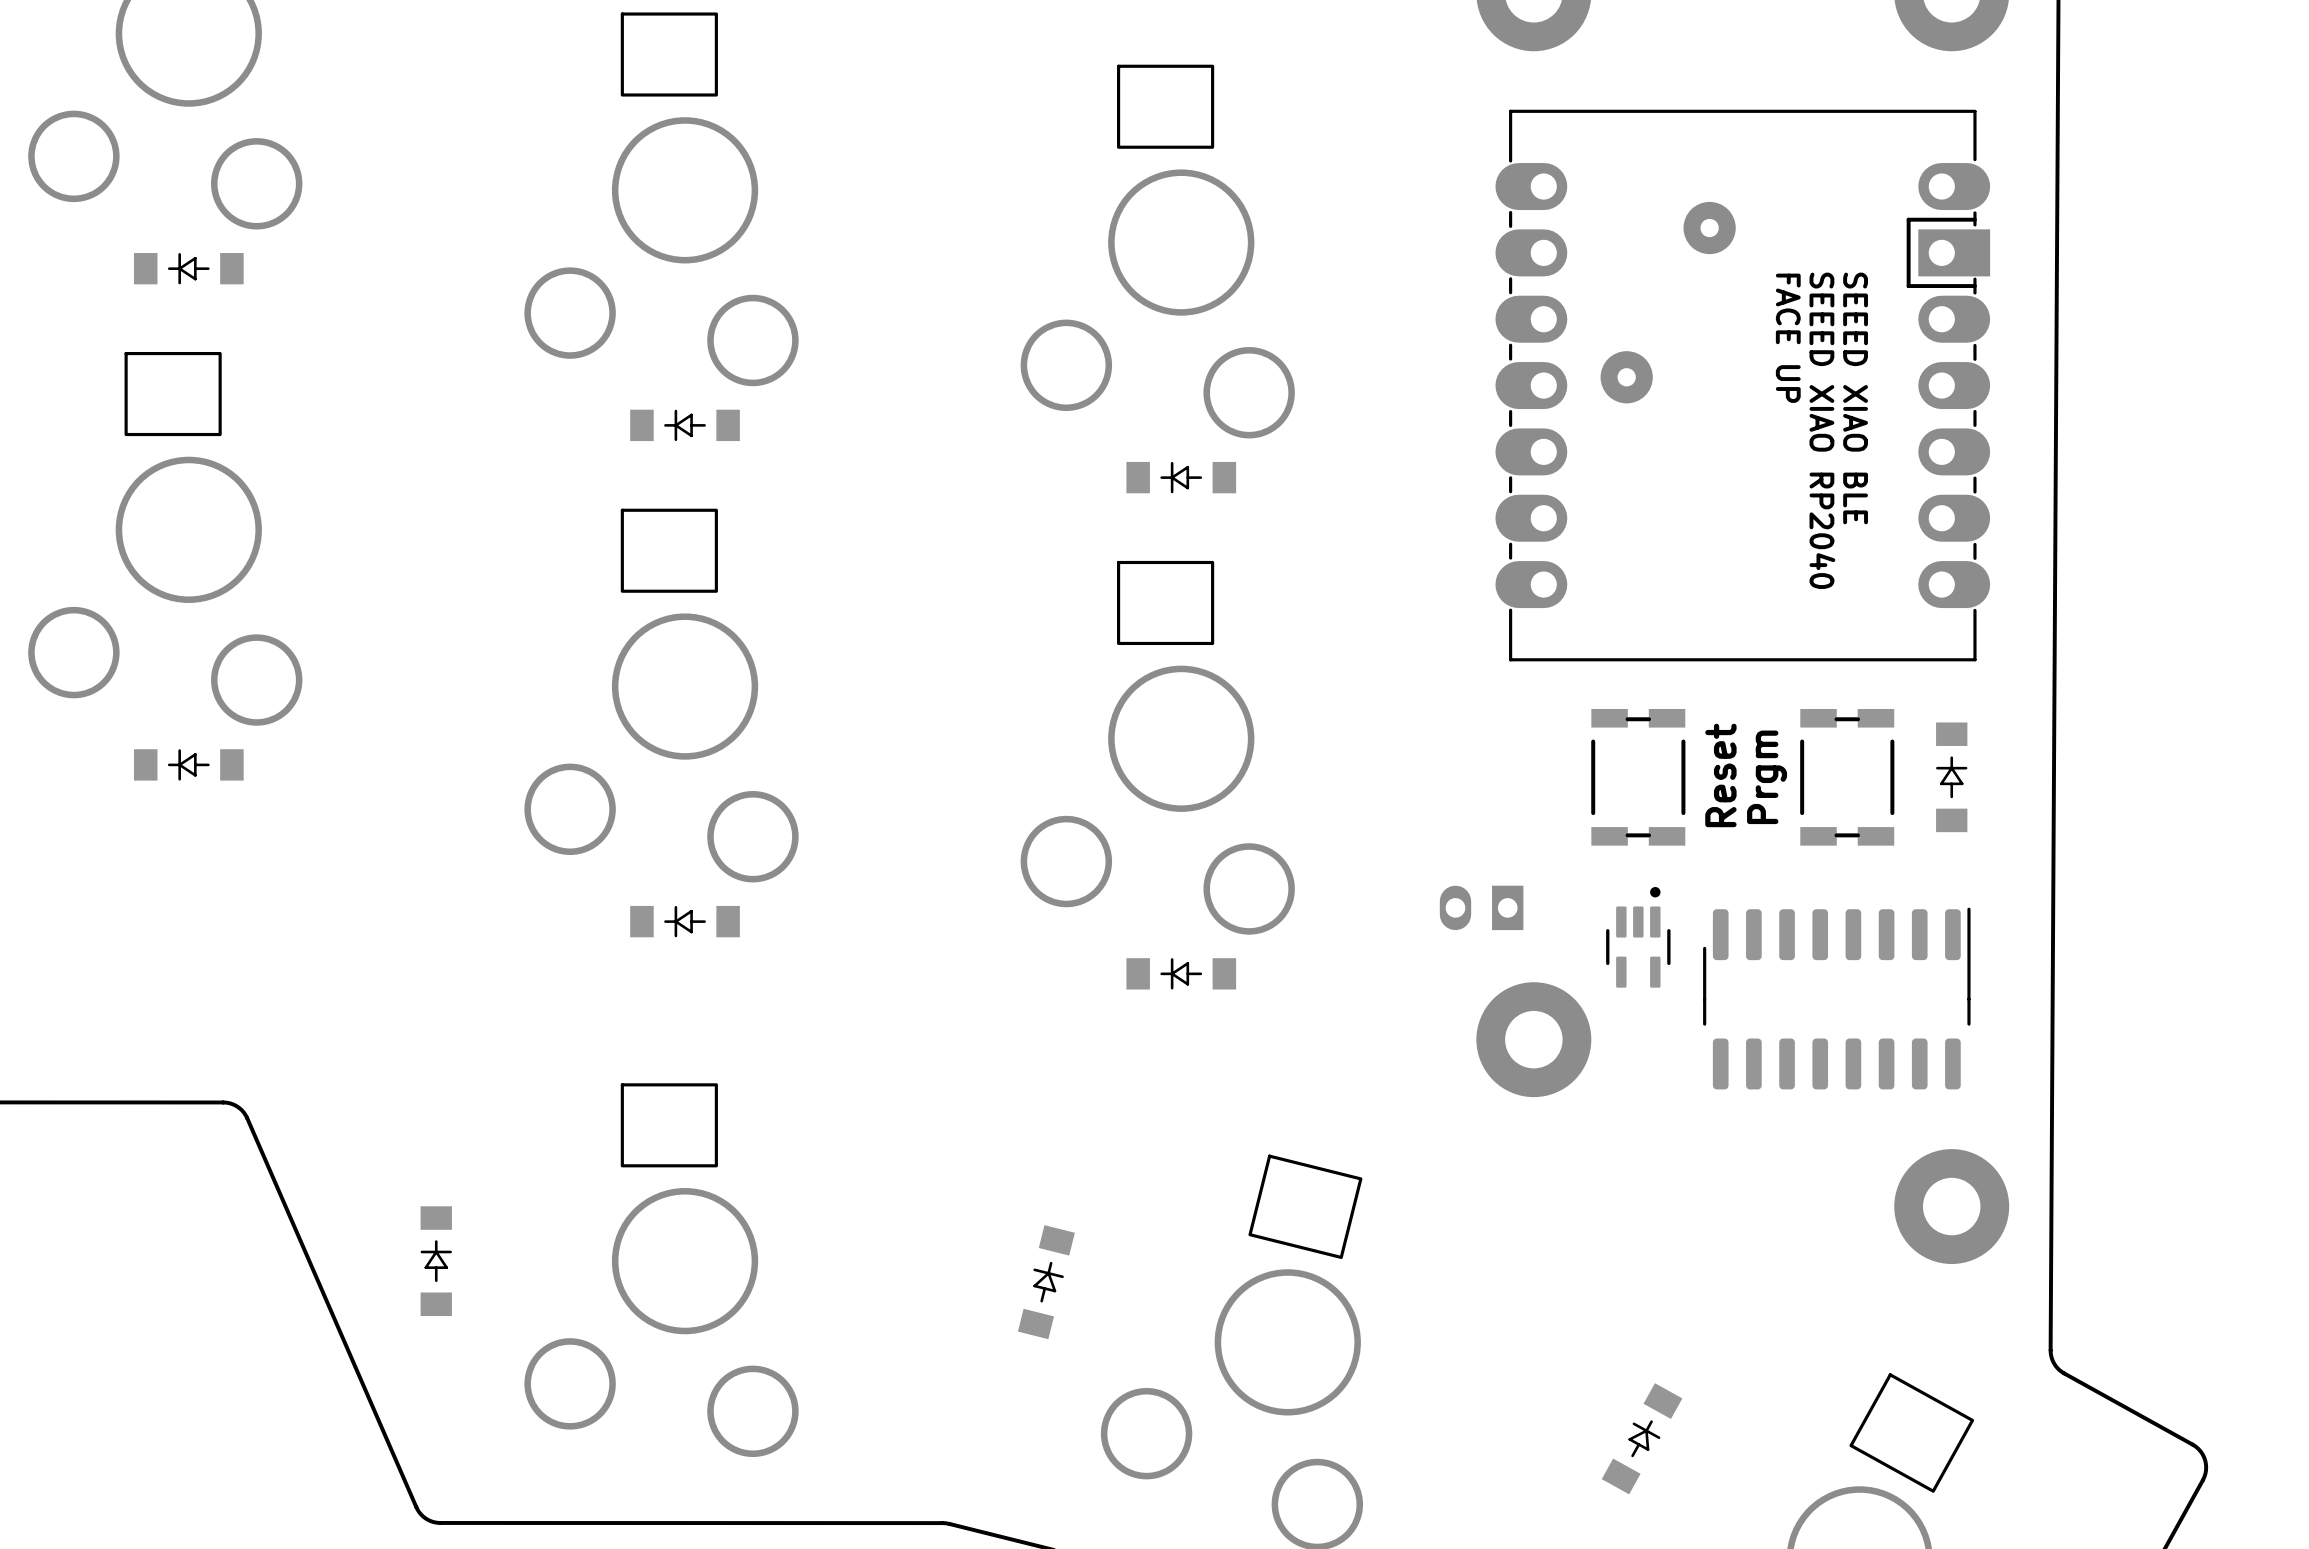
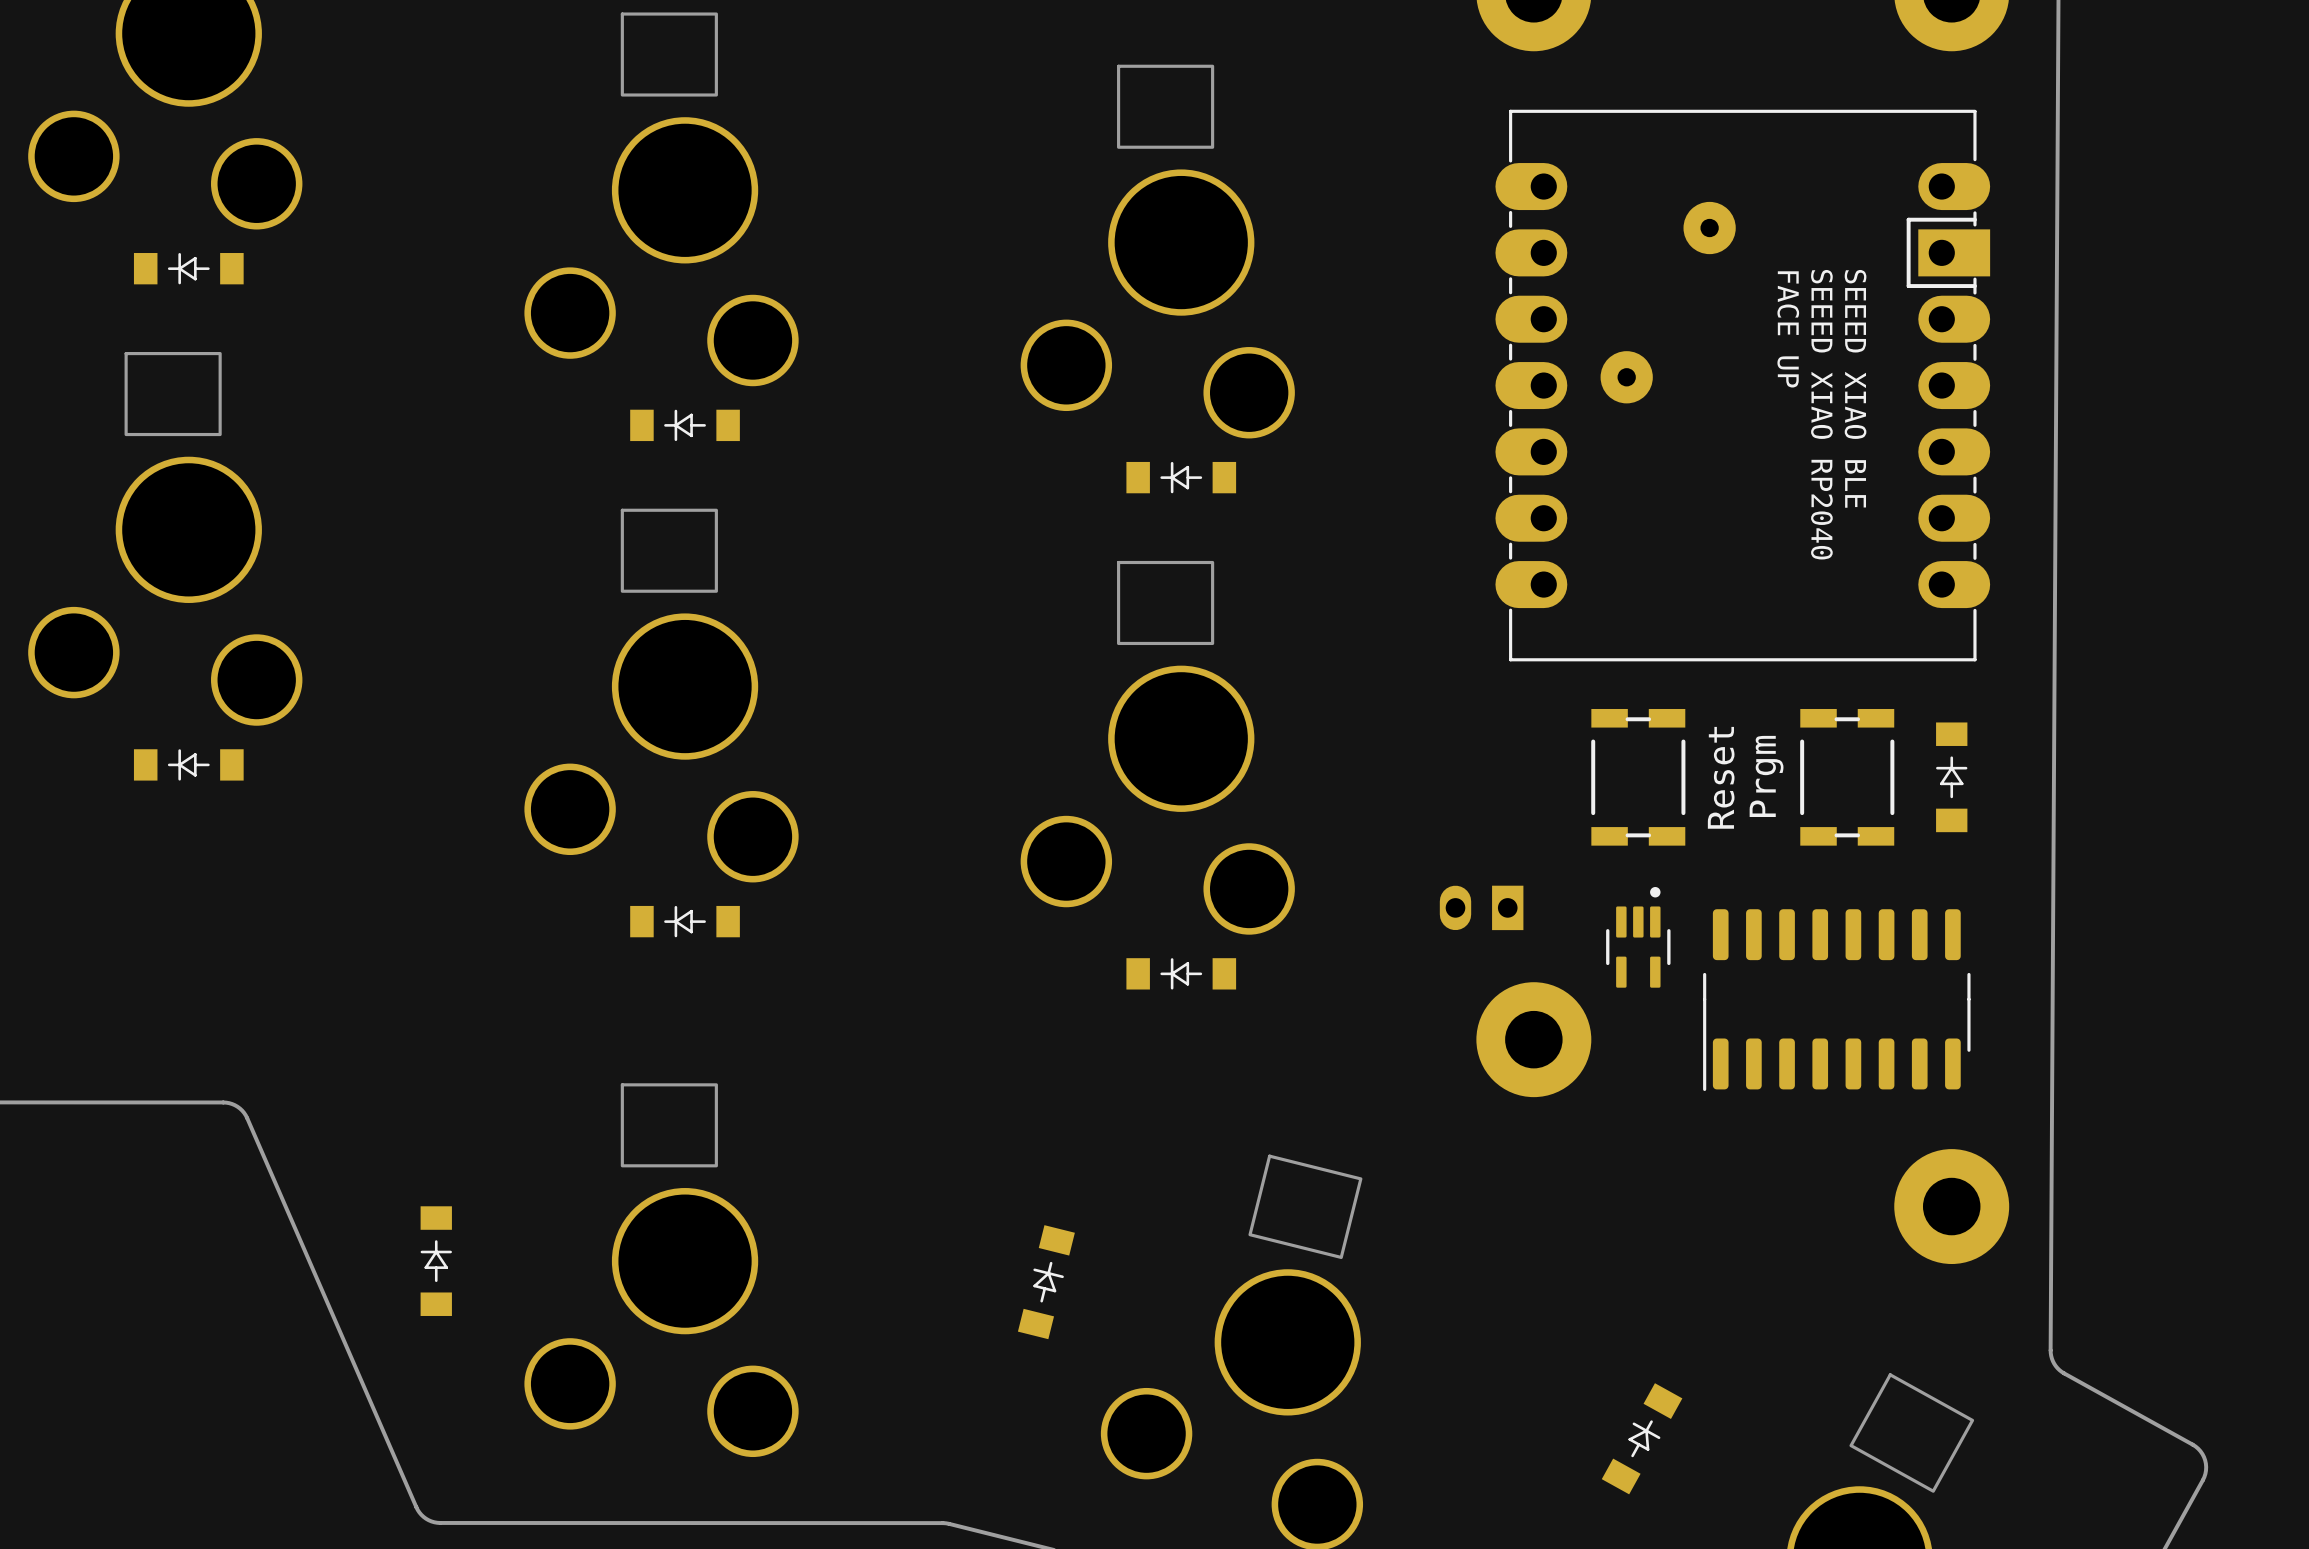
part rotation: 0° (1836, 998) -> 180° (1836, 1000)

